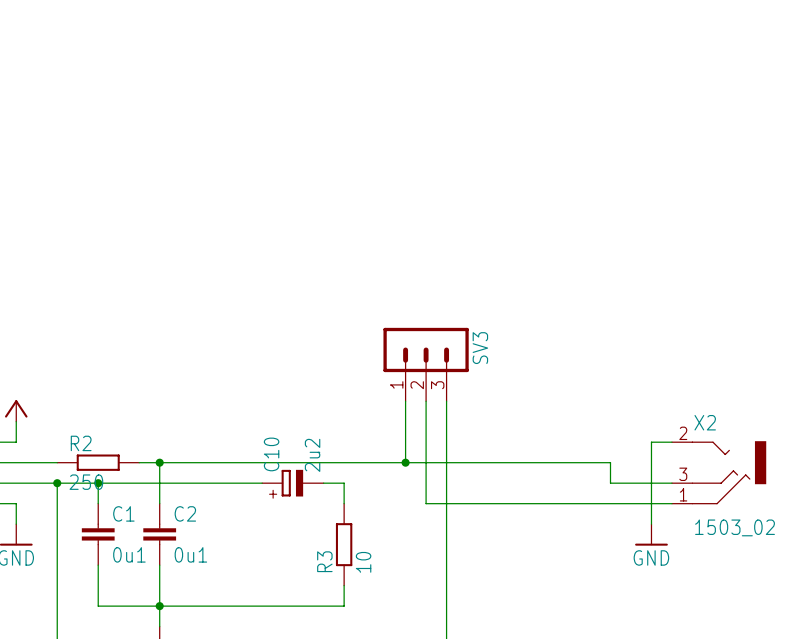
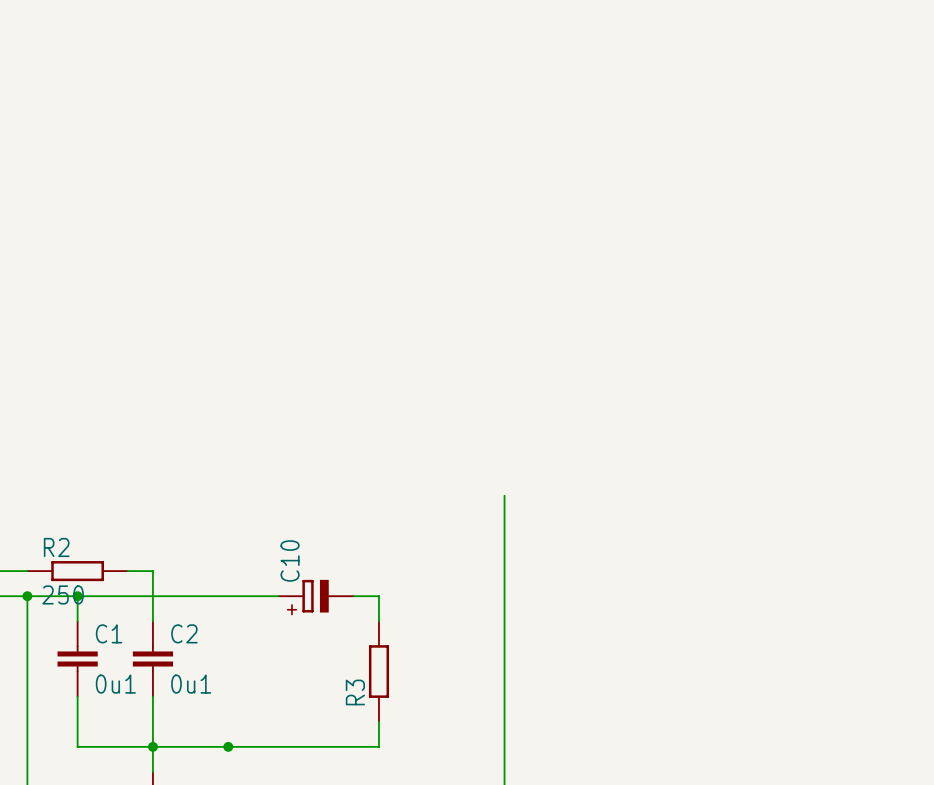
SV3: (426, 364) -> none
wire: (405, 401) (405, 462) -> none
wire: (426, 401) (426, 503) (671, 503) -> none
wire: (671, 442) (651, 442) (651, 524) -> none
C10 value: 2u2 (312, 455) -> none
wire: (159, 462) (610, 462) (610, 483) (671, 483) -> none
junction: (159, 462) -> none
junction: (405, 462) -> none
X2: 1503_02 (719, 472) -> none
power symbol: GND (651, 534) -> none
R3 value: 10 (363, 562) -> none
junction: none -> (228, 746)

